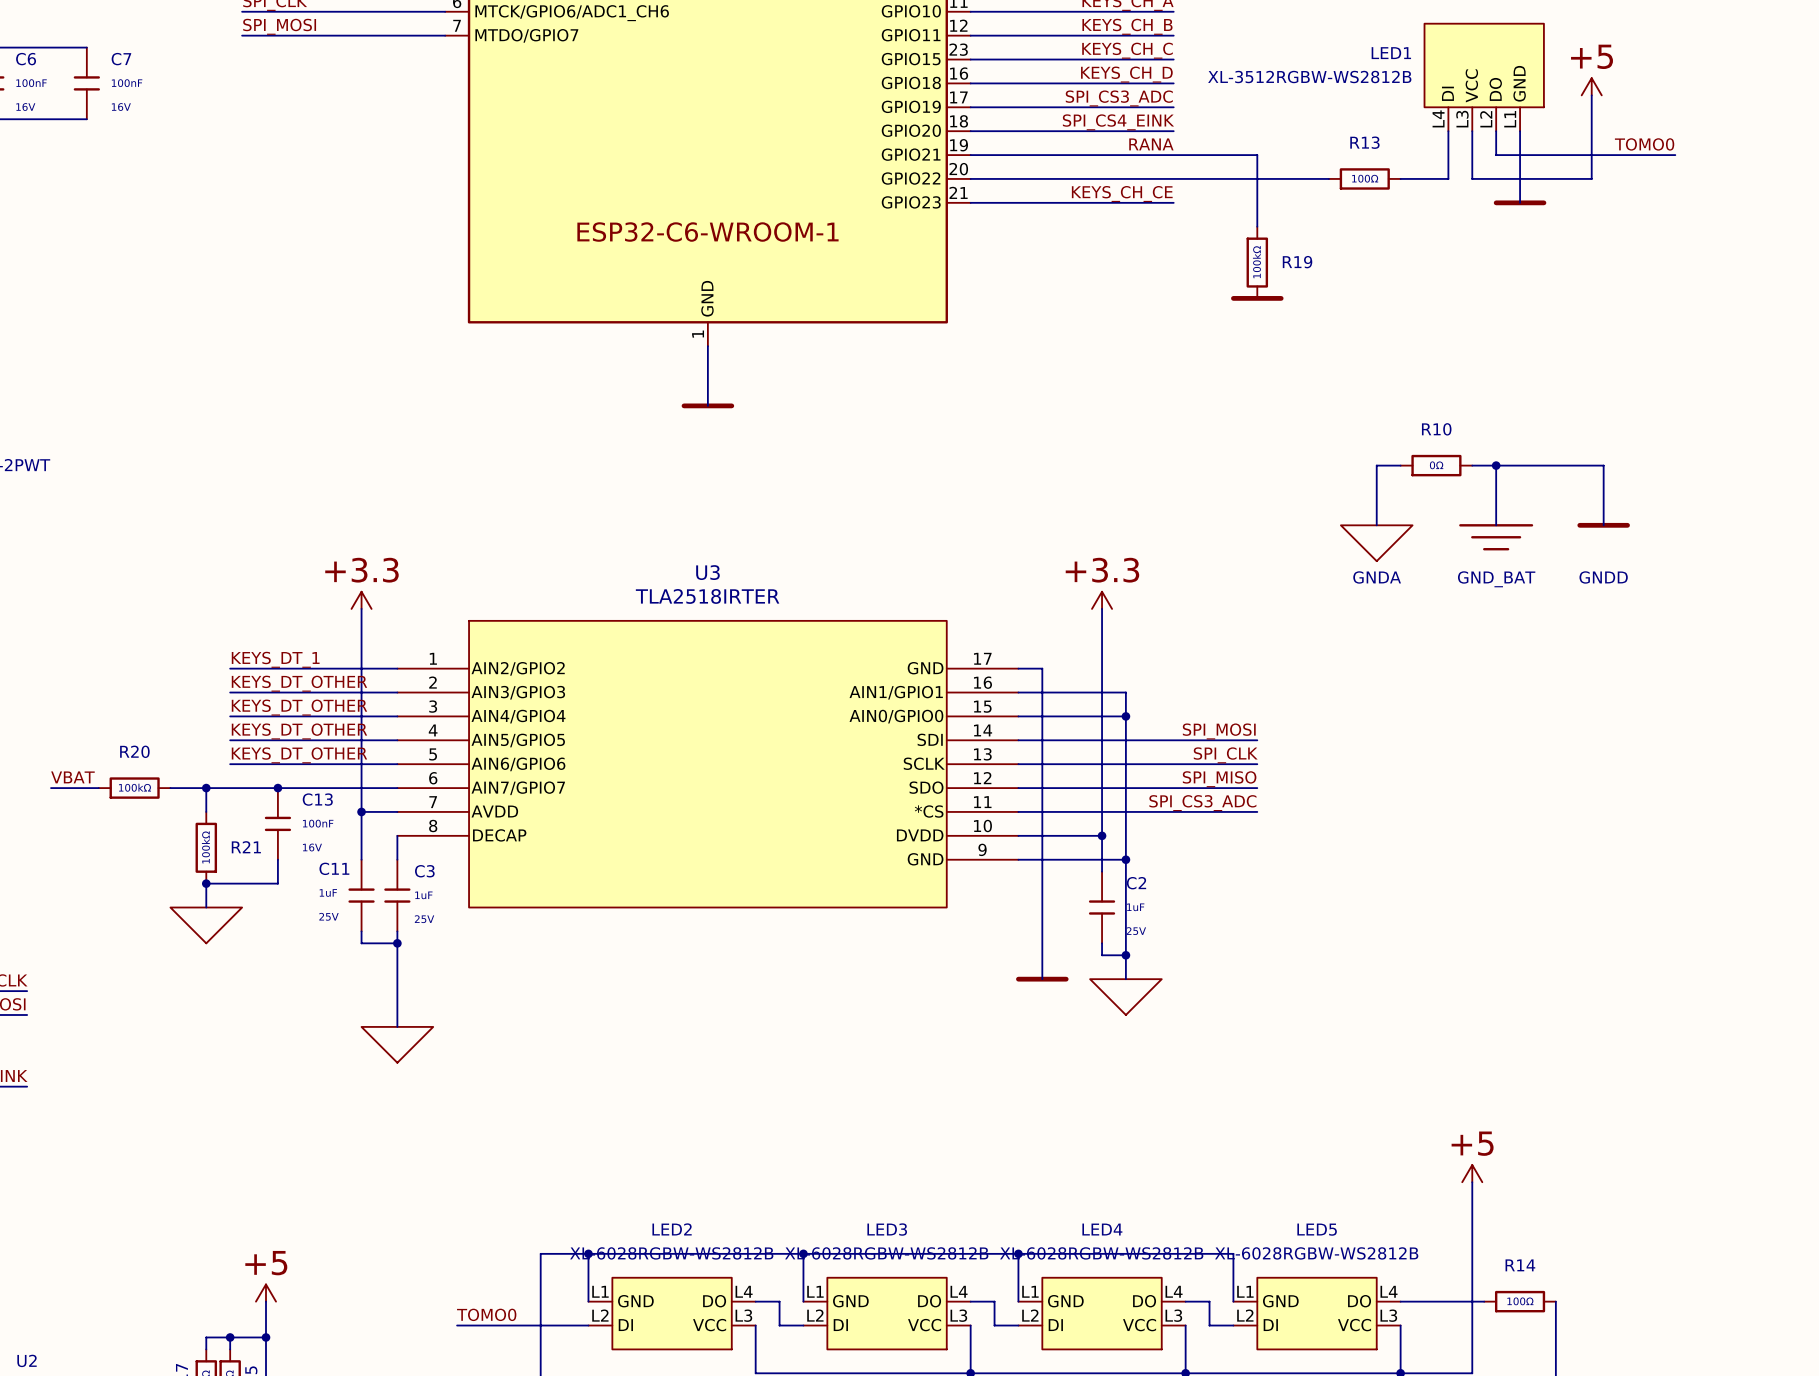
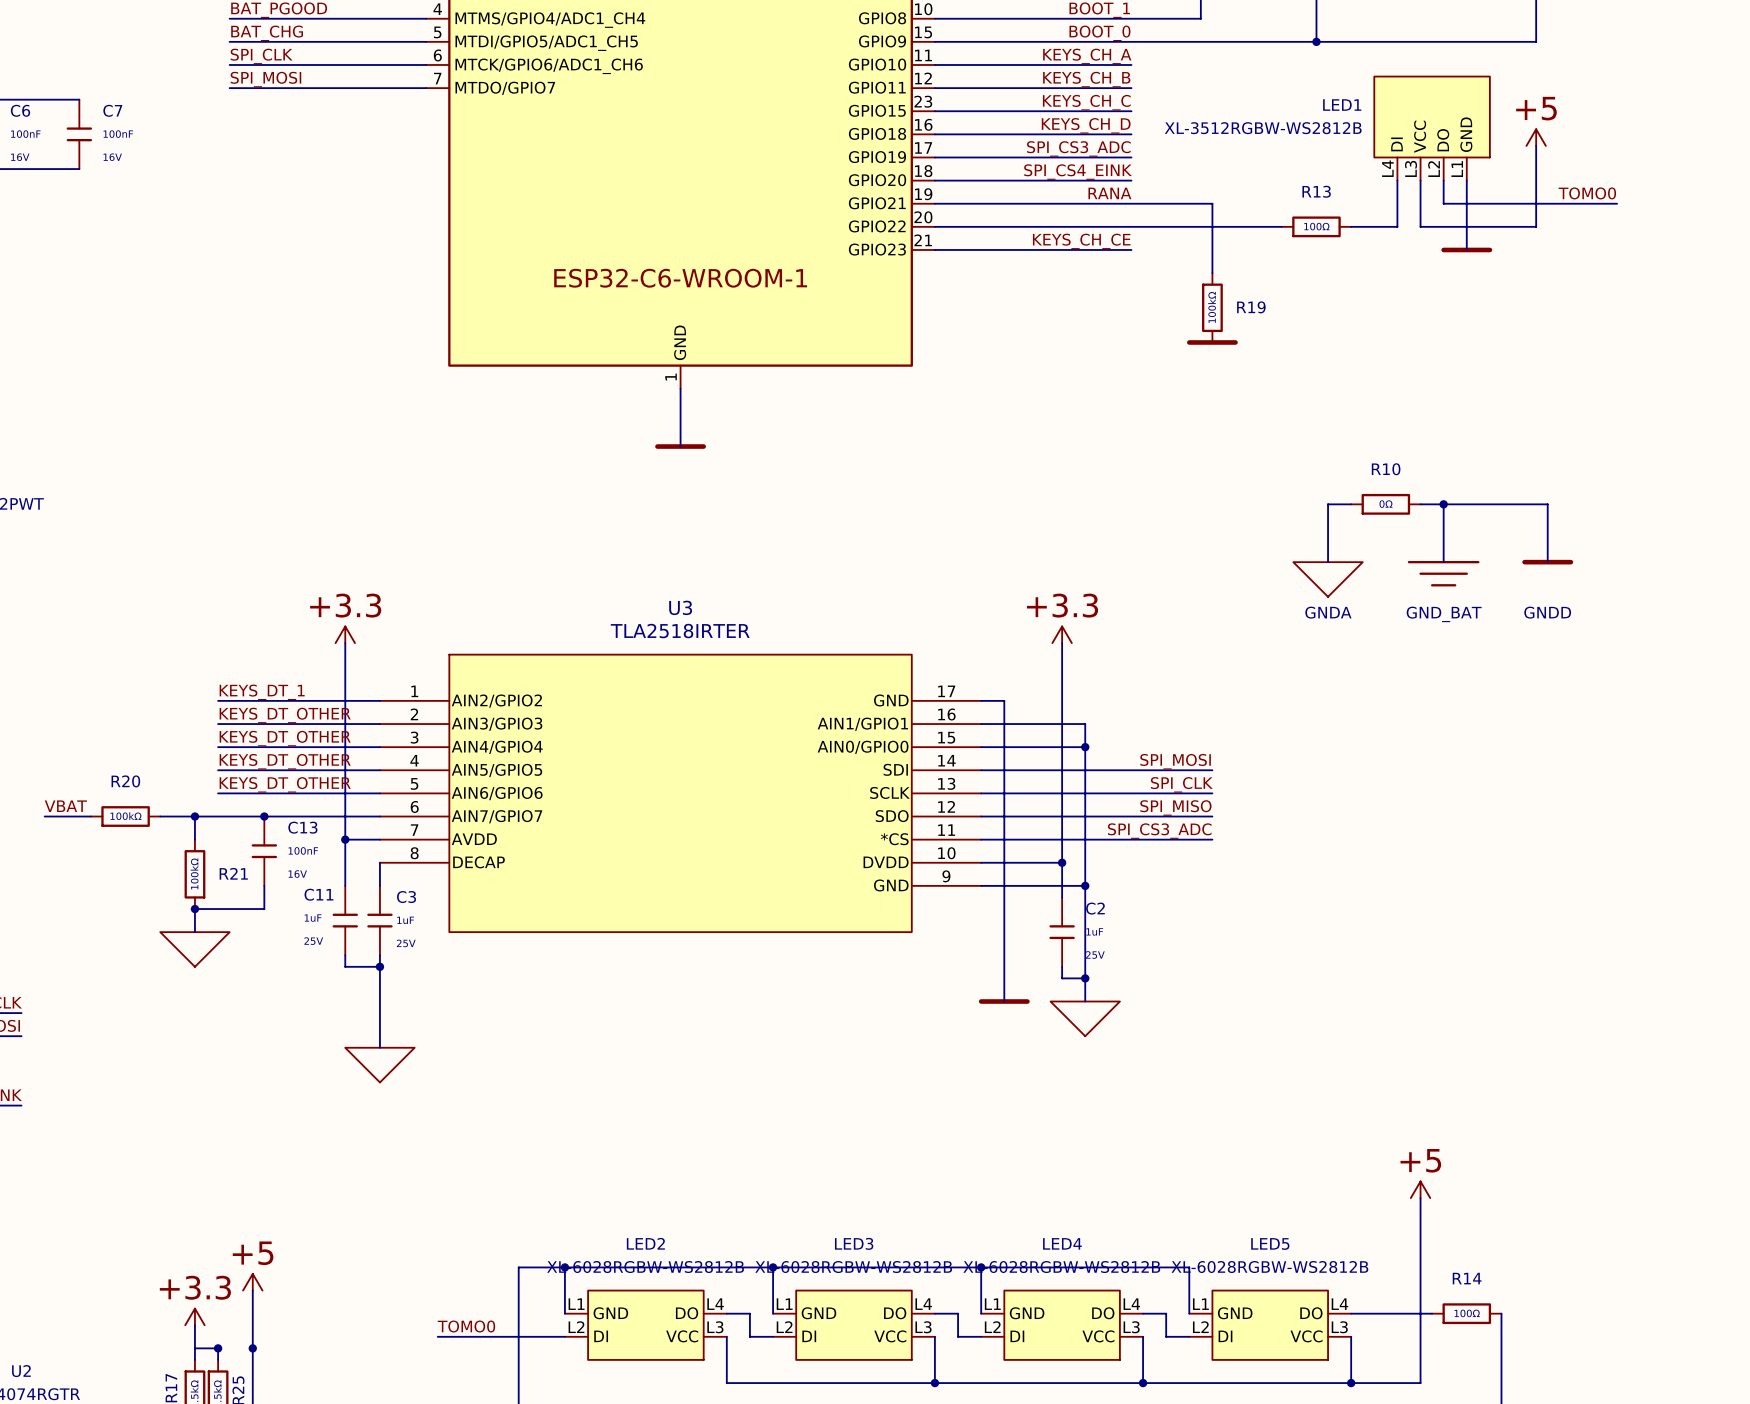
power symbol position: (266, 1293) -> (252, 1282)
power symbol: none -> (194, 1316)
wire: none -> (194, 1325) (194, 1348)
wire: (230, 1337) (266, 1337) -> none

